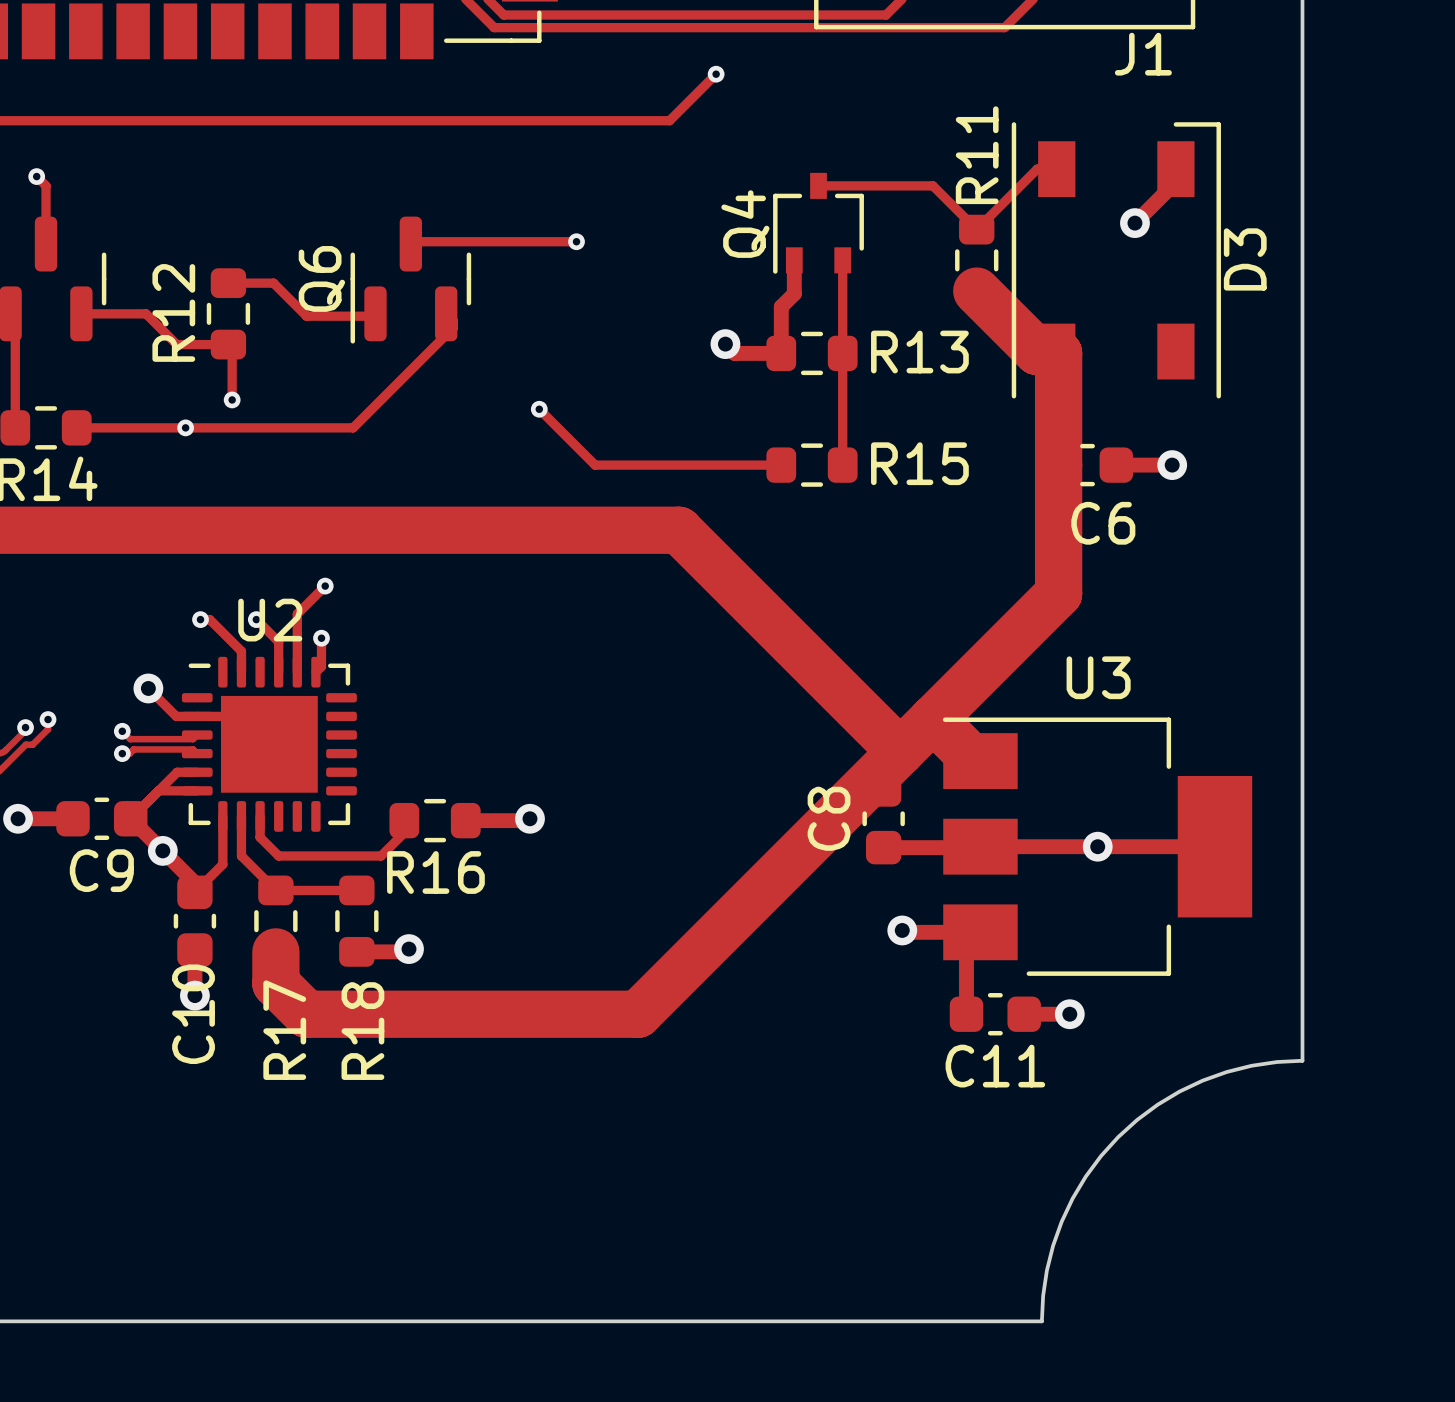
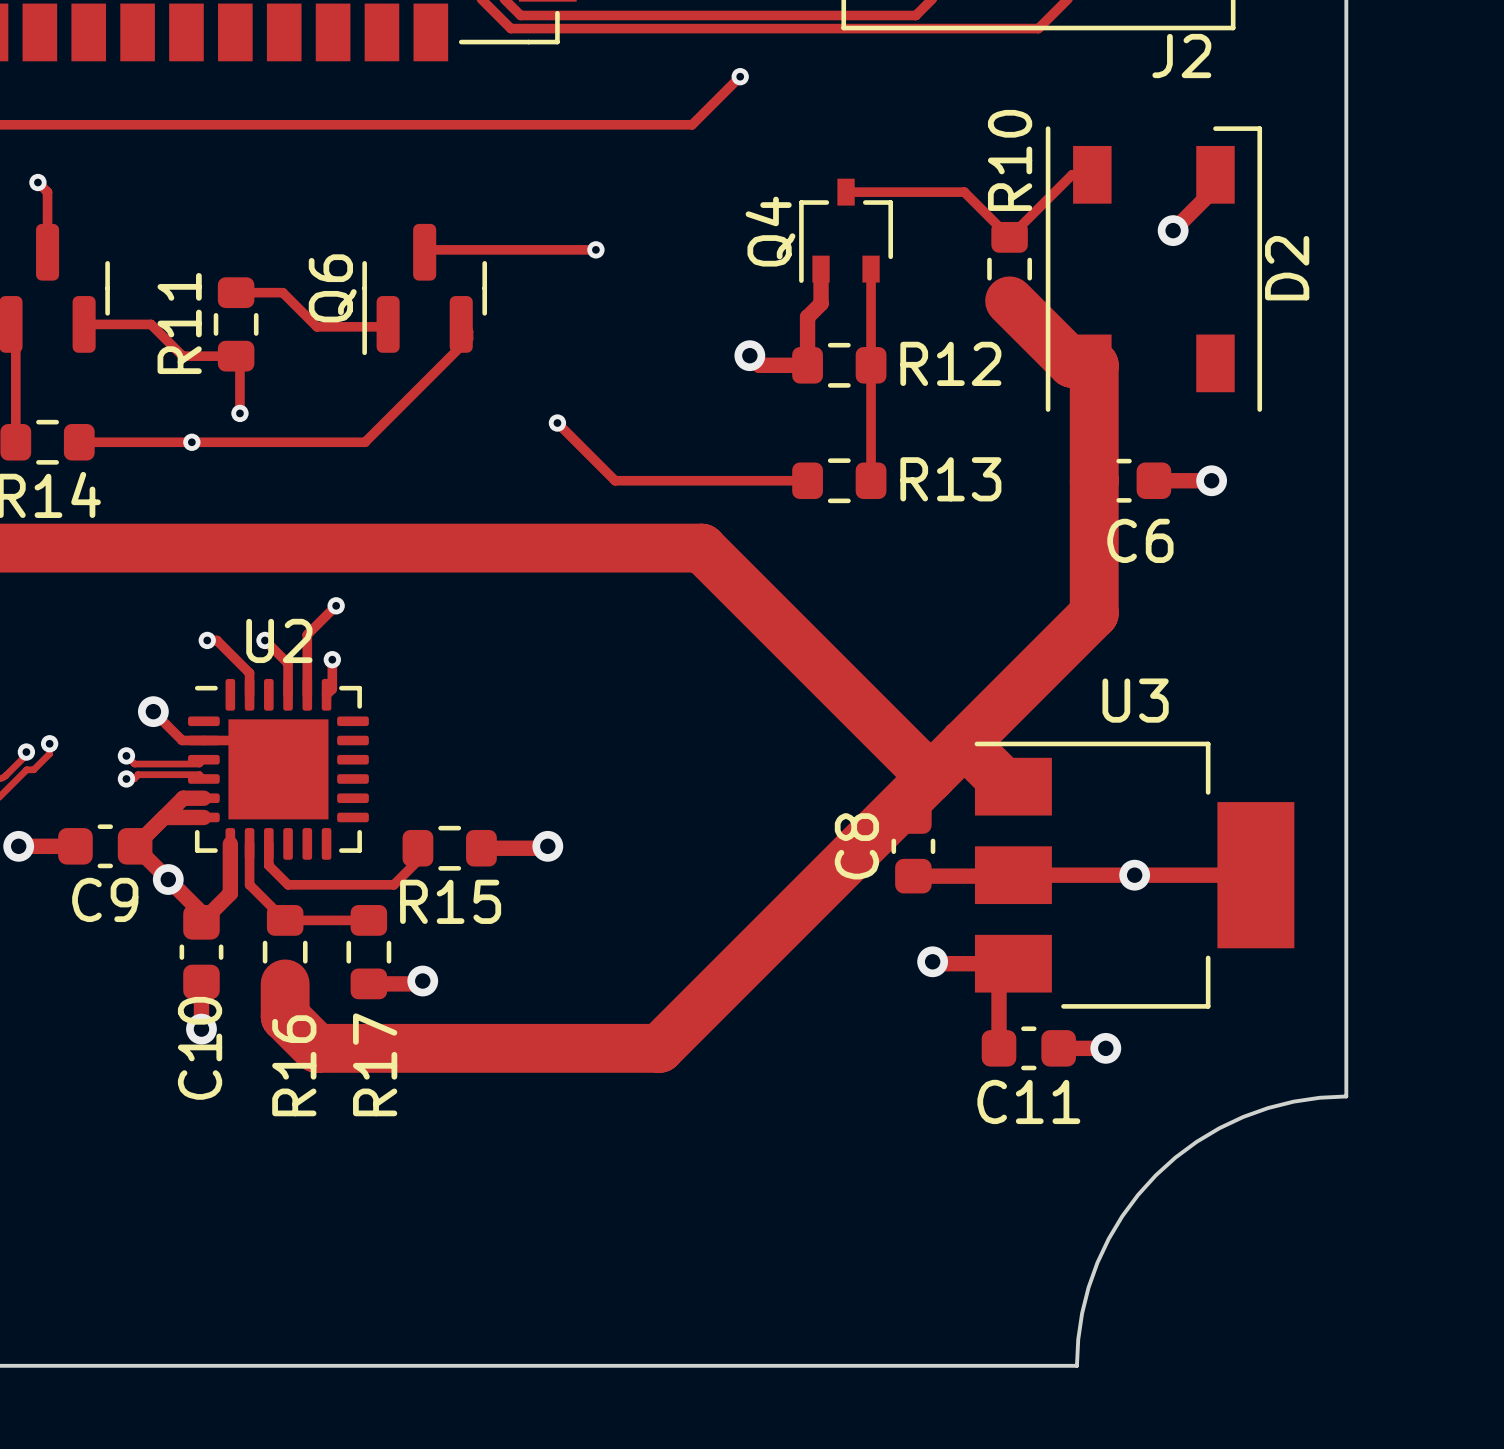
J1 name: J1 (1143, 54) -> J2 (1181, 56)
R11 name: R11 (977, 155) -> R10 (1010, 160)
D3 name: D3 (1245, 259) -> D2 (1287, 268)
R12 name: R12 (173, 312) -> R11 (179, 323)
R13 name: R13 (919, 352) -> R12 (950, 363)
R15 name: R15 (919, 463) -> R13 (950, 479)
track width: thin (197, 772) (177, 772) (130, 818) -> thick (203, 798) (183, 798) (135, 846)
track width: thin (158, 790) (197, 790) -> thick (163, 817) (203, 817)
track width: thin (222, 816) (222, 864) (194, 892) -> thick (230, 843) (230, 893) (201, 922)
R16 name: R16 (435, 872) -> R15 (450, 901)
R17 name: R17 (284, 1030) -> R16 (294, 1065)
R18 name: R18 (362, 1031) -> R17 (375, 1064)

